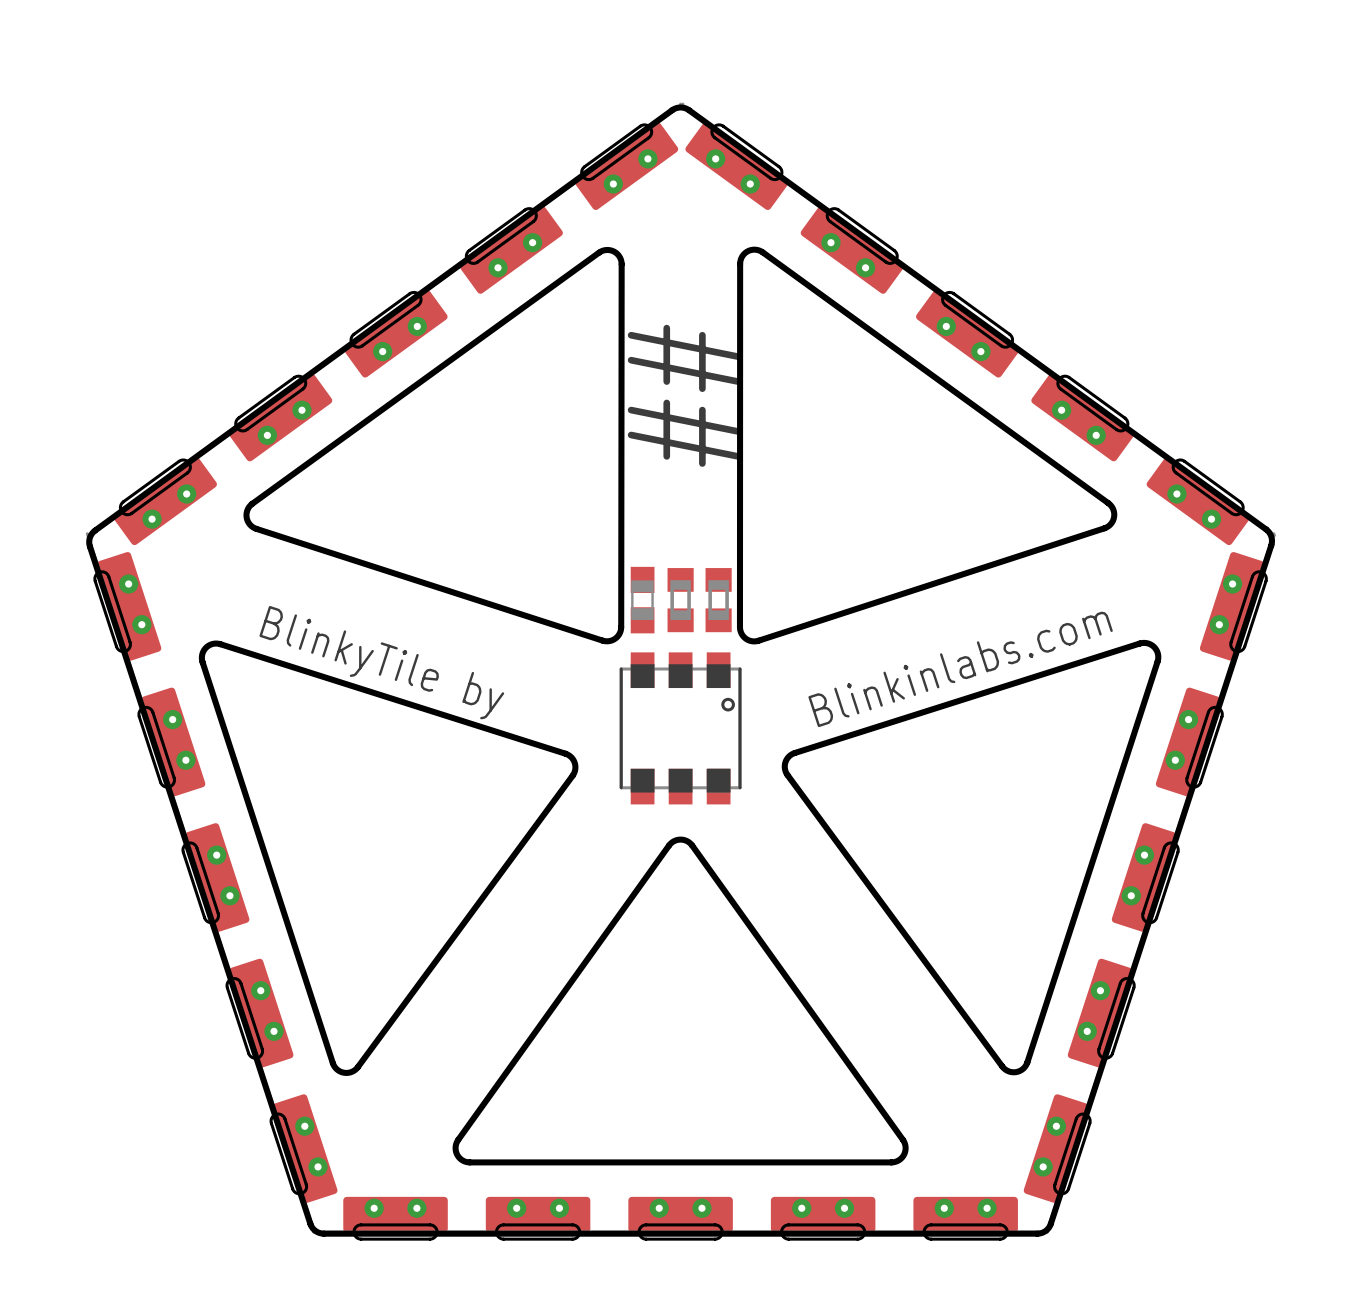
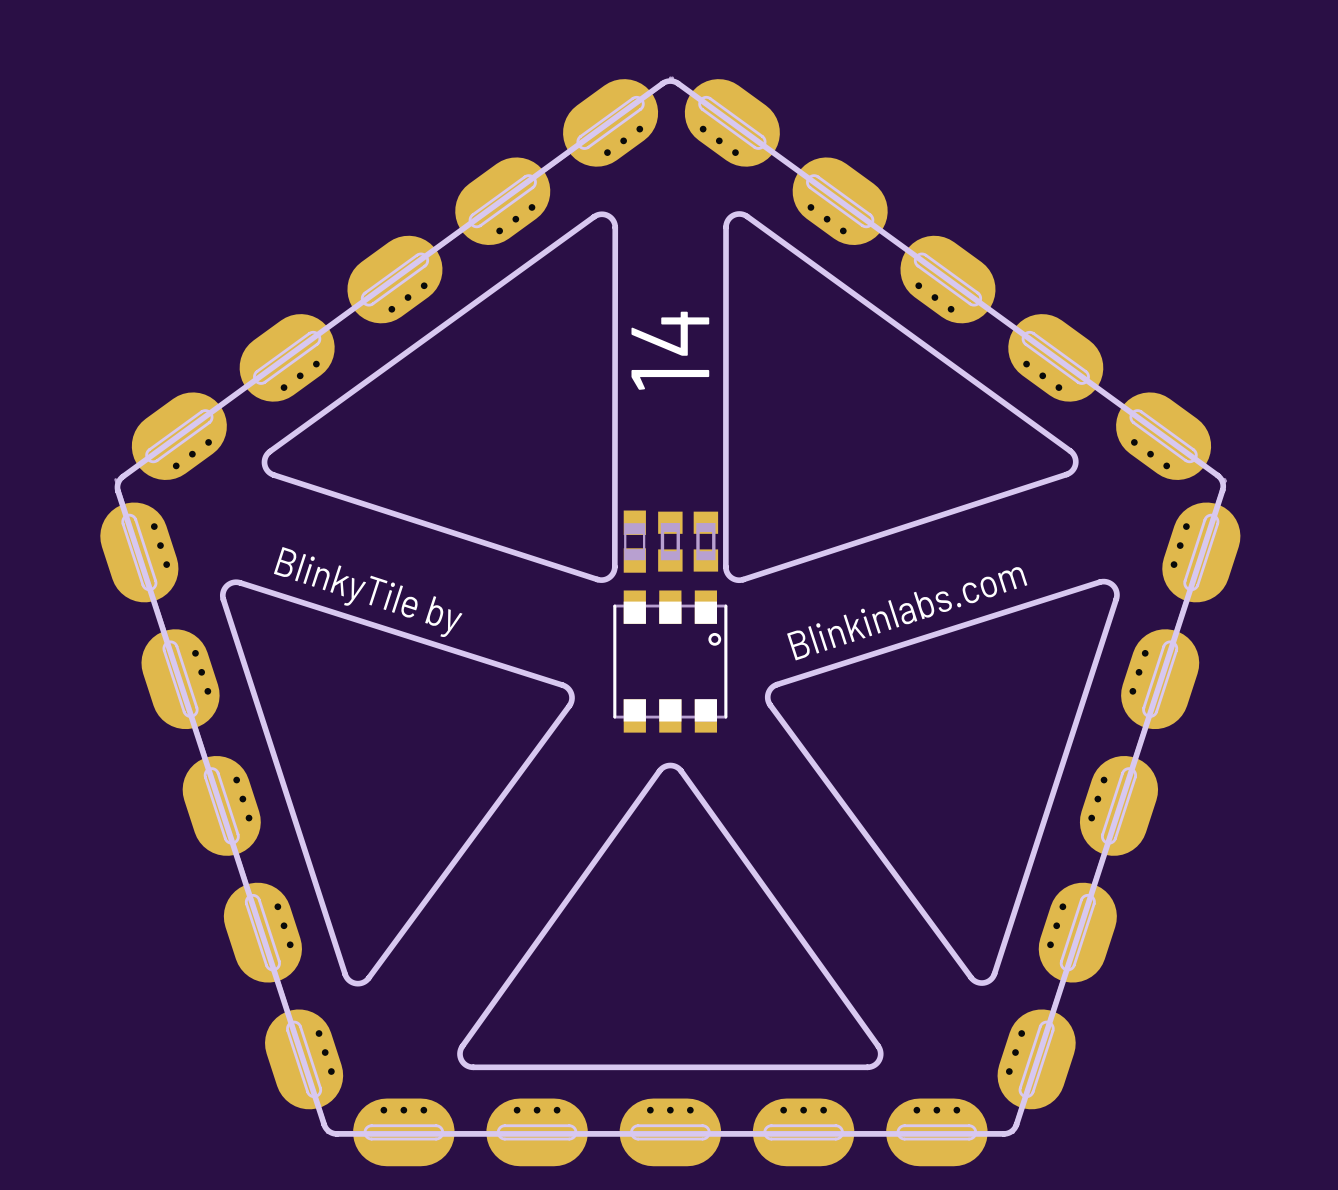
part footprint: [87, 102, 685, 546] -> [115, 76, 674, 483]
part footprint: [679, 102, 1276, 546] -> [668, 76, 1227, 483]
text: ## (684, 395) -> 14 (670, 350)
part footprint: [85, 532, 338, 1234] -> [100, 478, 344, 1134]
part footprint: [1023, 532, 1276, 1234] -> [997, 478, 1241, 1134]
part footprint: [312, 1196, 1050, 1241] -> [325, 1098, 1015, 1167]

